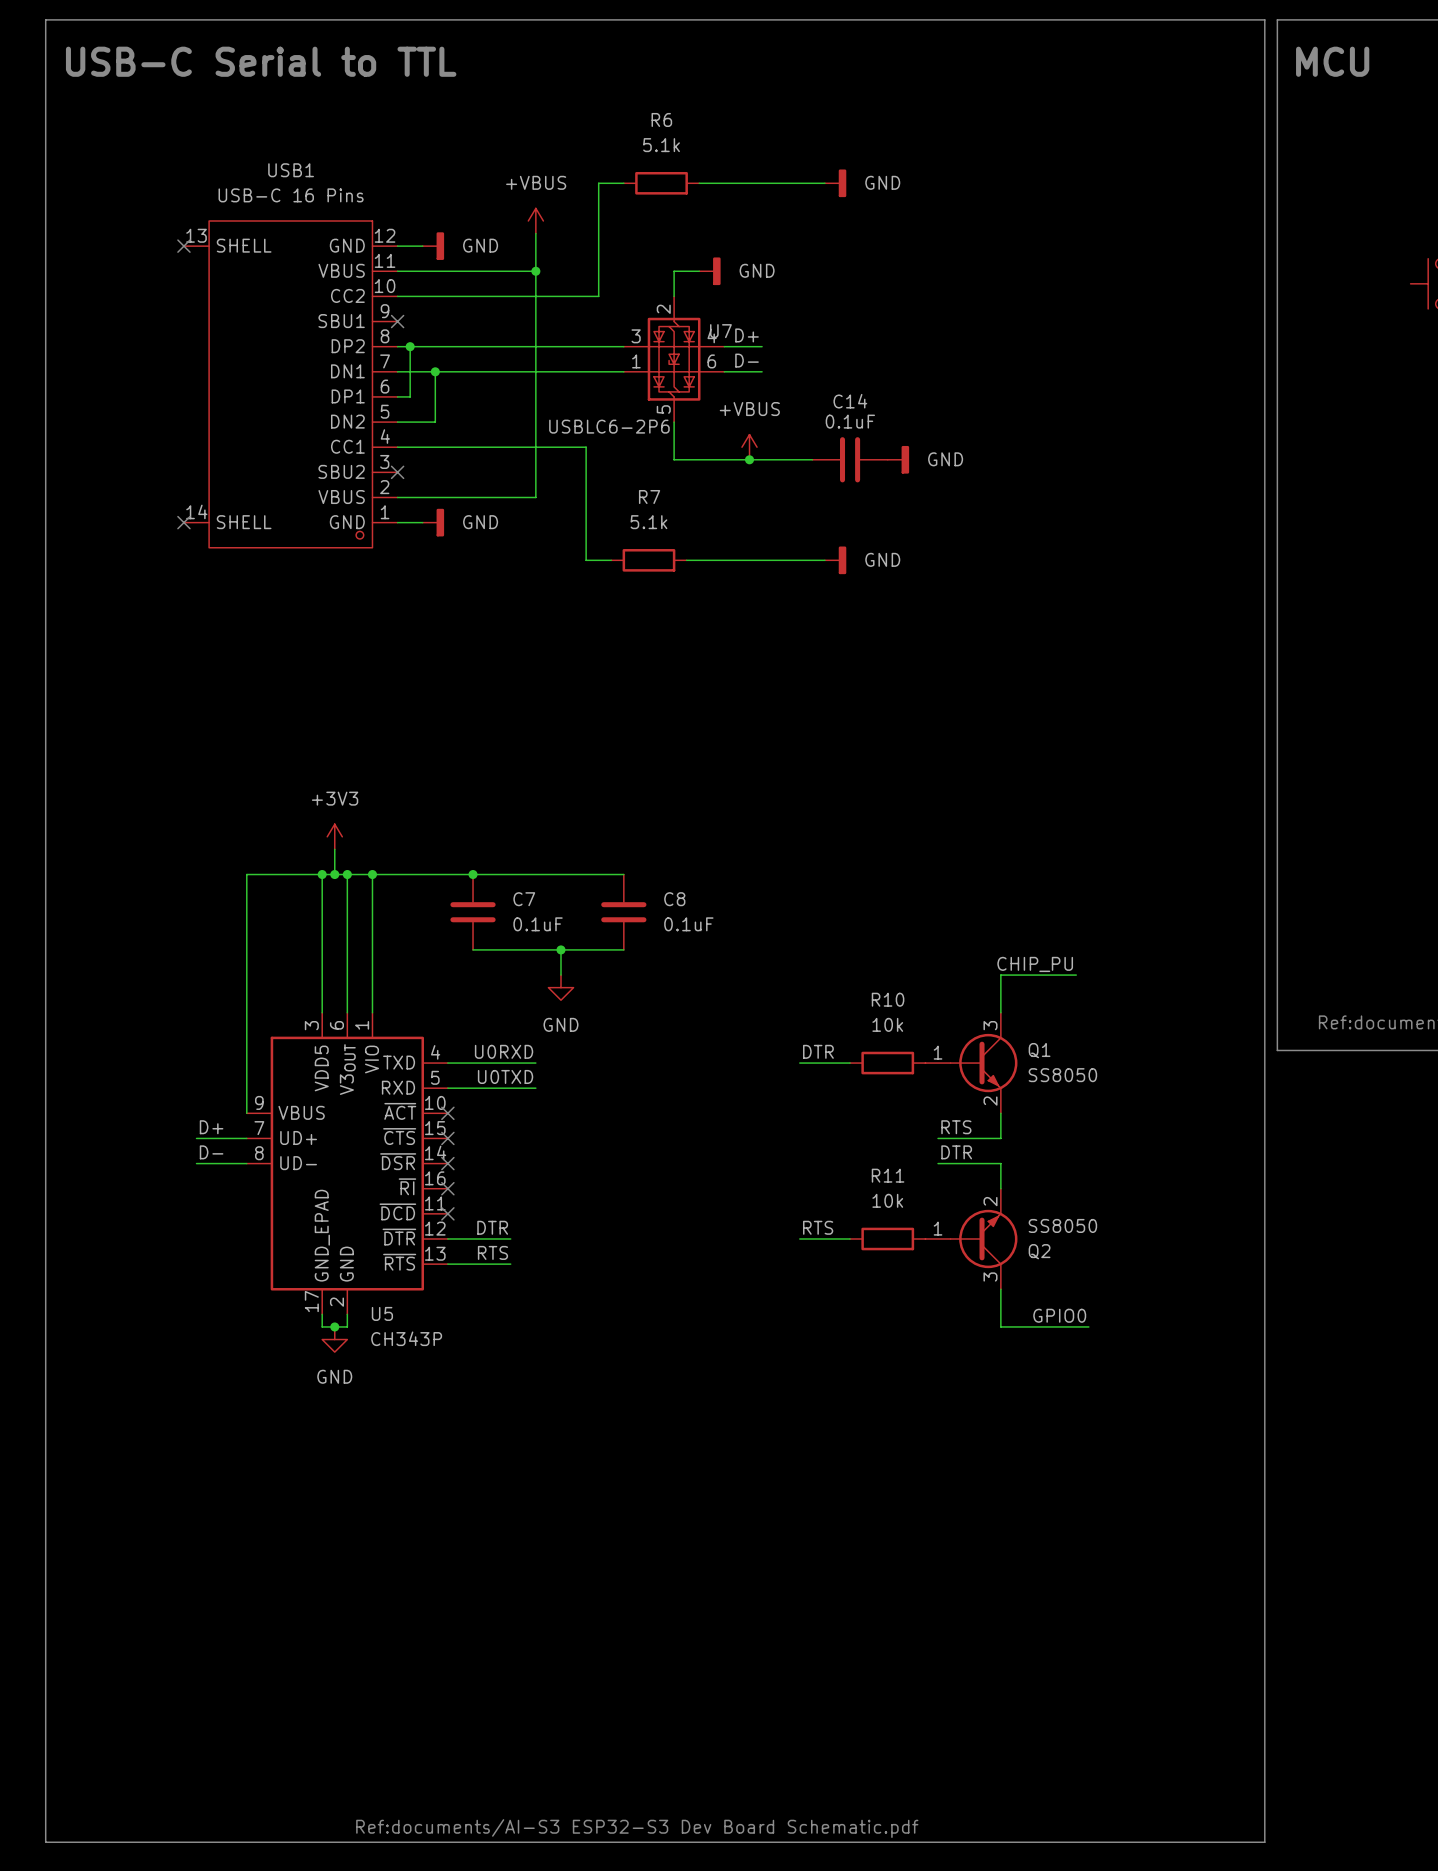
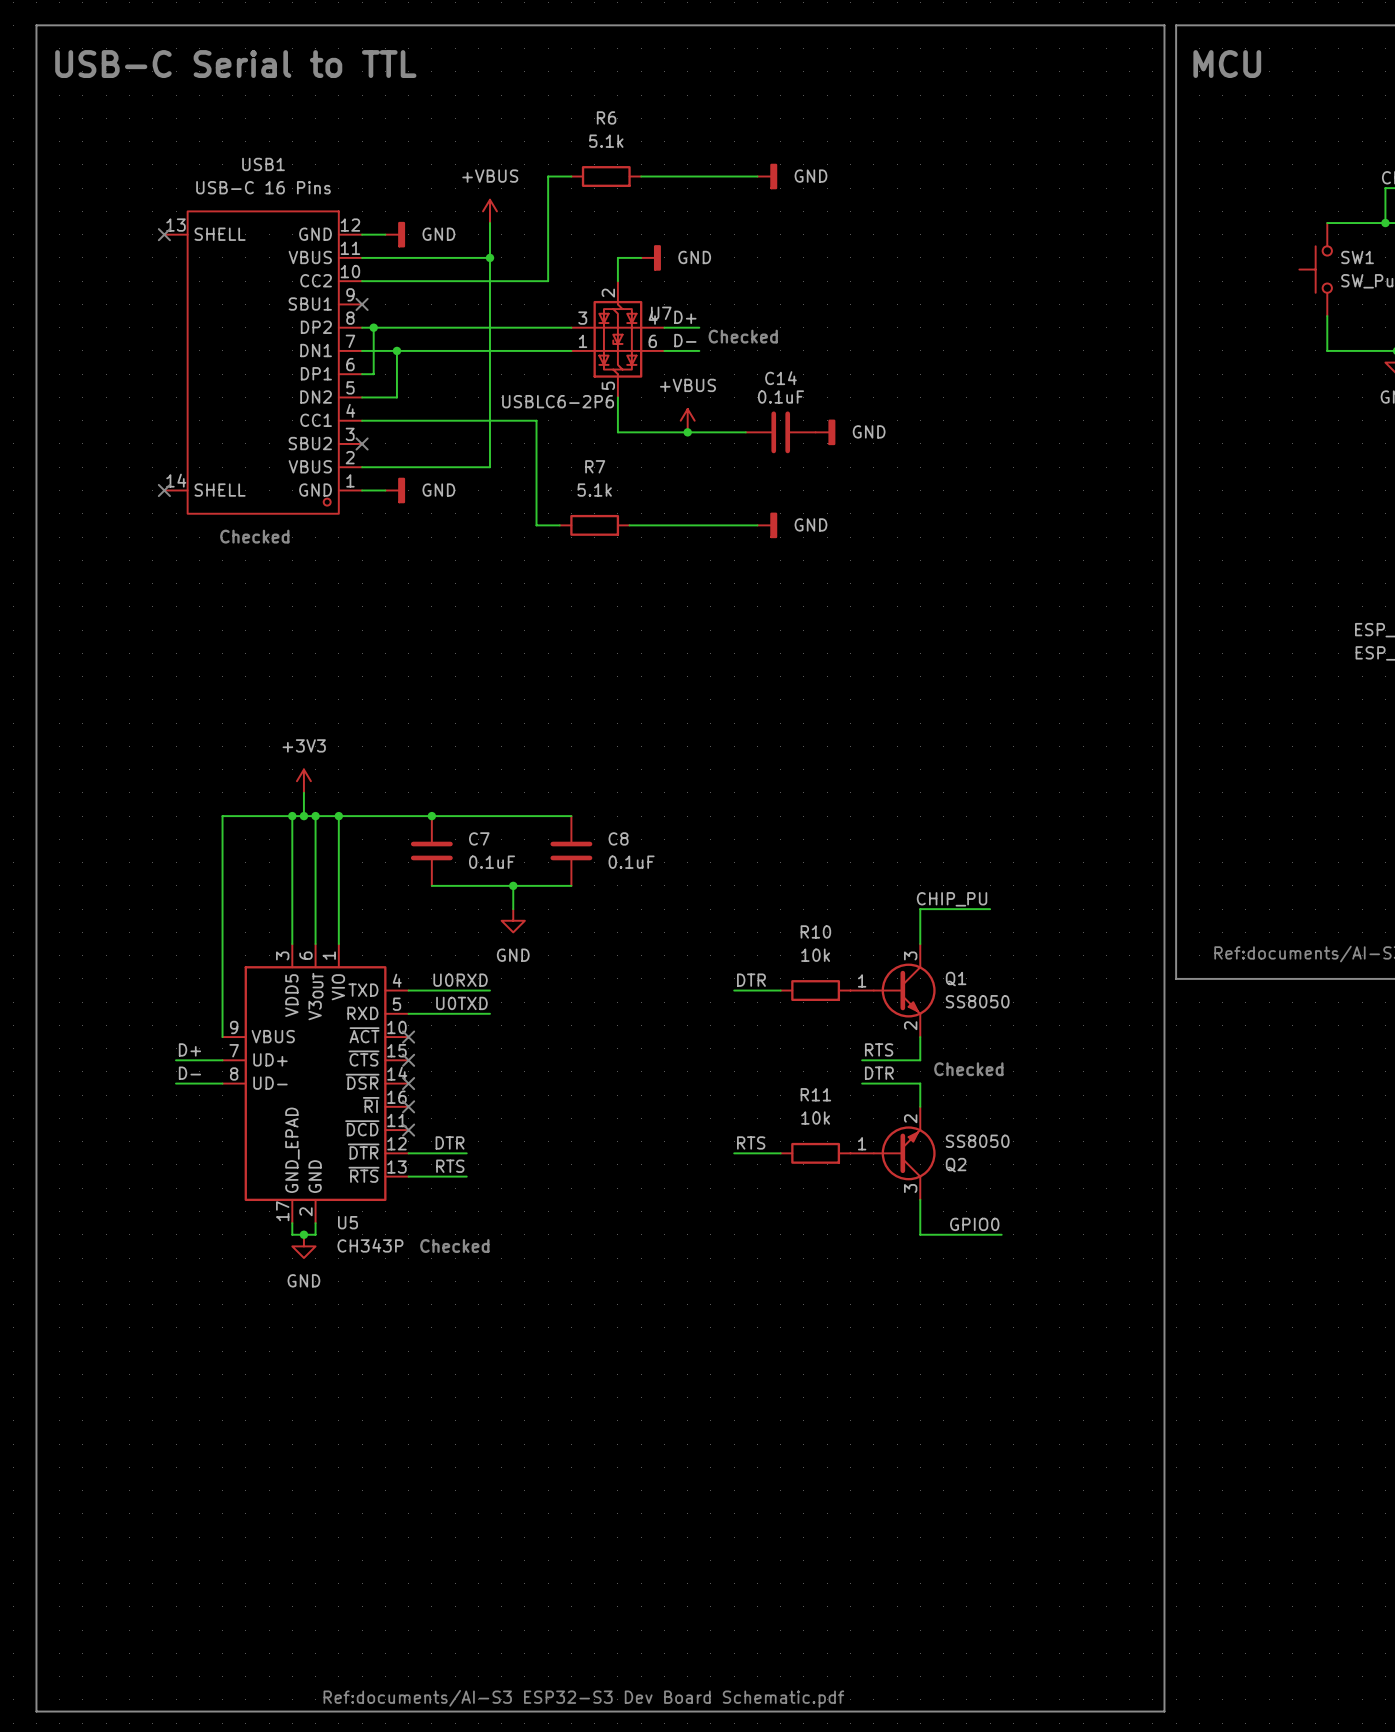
text: none -> Checked (743, 336)
text: none -> Checked (254, 536)
text: none -> Checked (968, 1069)
text: none -> Checked (454, 1245)

